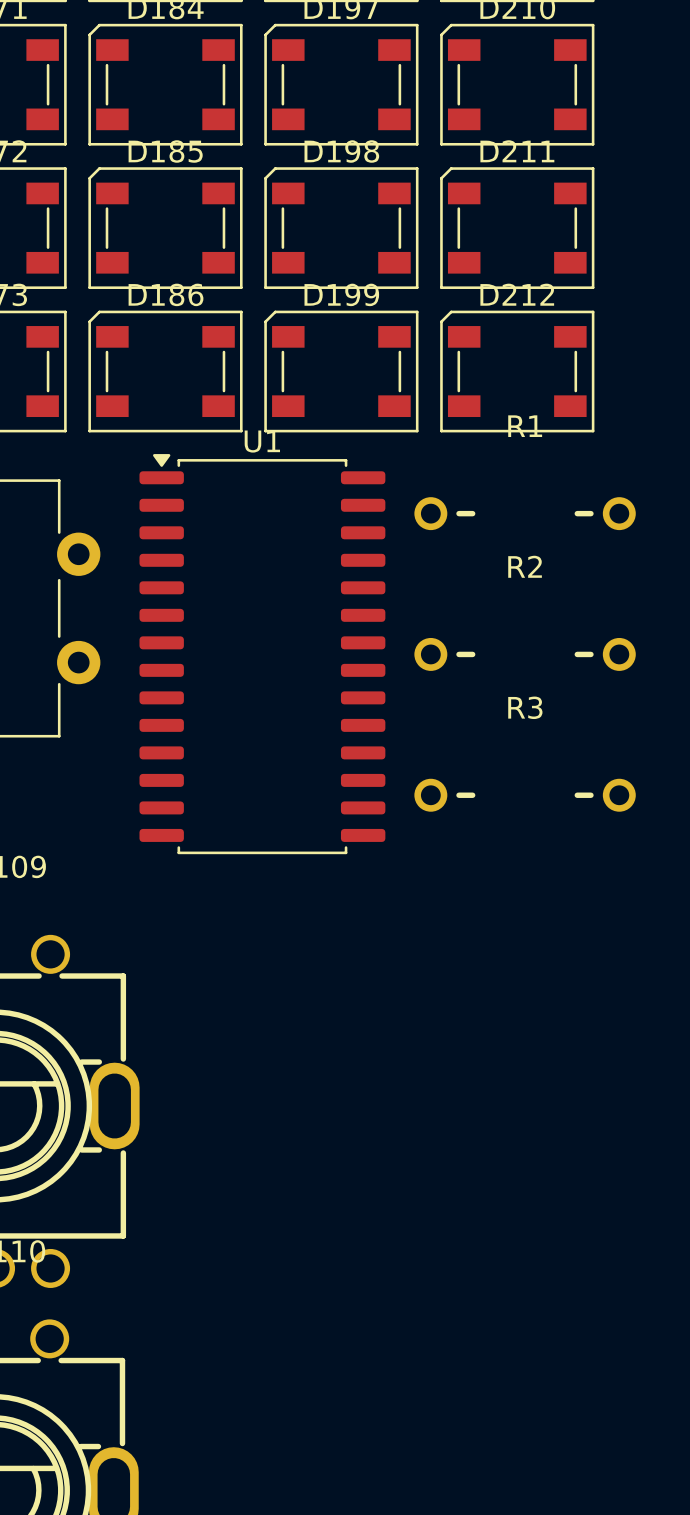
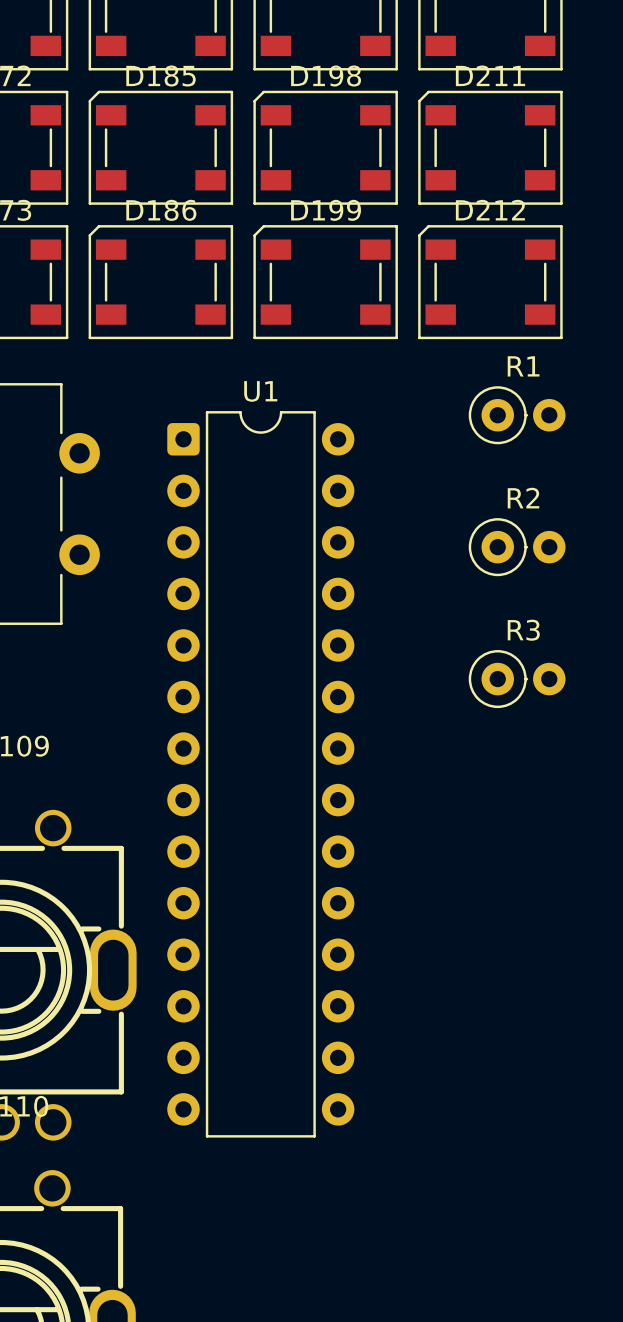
U1 name position: U1 (262, 441) -> U1 (260, 391)
U1 footprint: [139, 454, 386, 855] -> [167, 411, 355, 1138]
R1 footprint: [414, 497, 636, 531] -> [468, 386, 566, 445]
R2 footprint: [414, 637, 636, 671] -> [468, 518, 566, 577]
R3 footprint: [414, 778, 636, 812] -> [468, 650, 566, 709]

